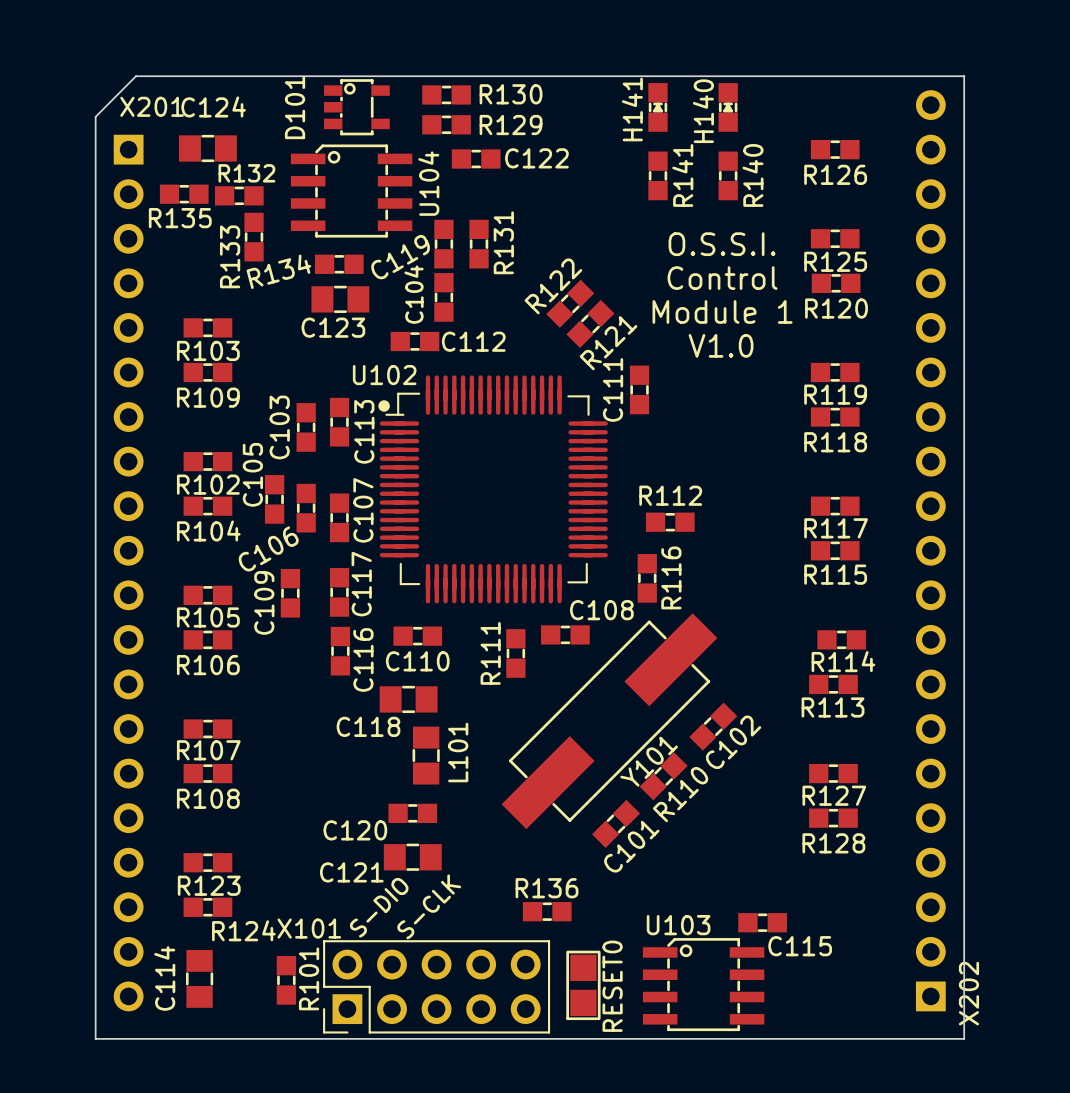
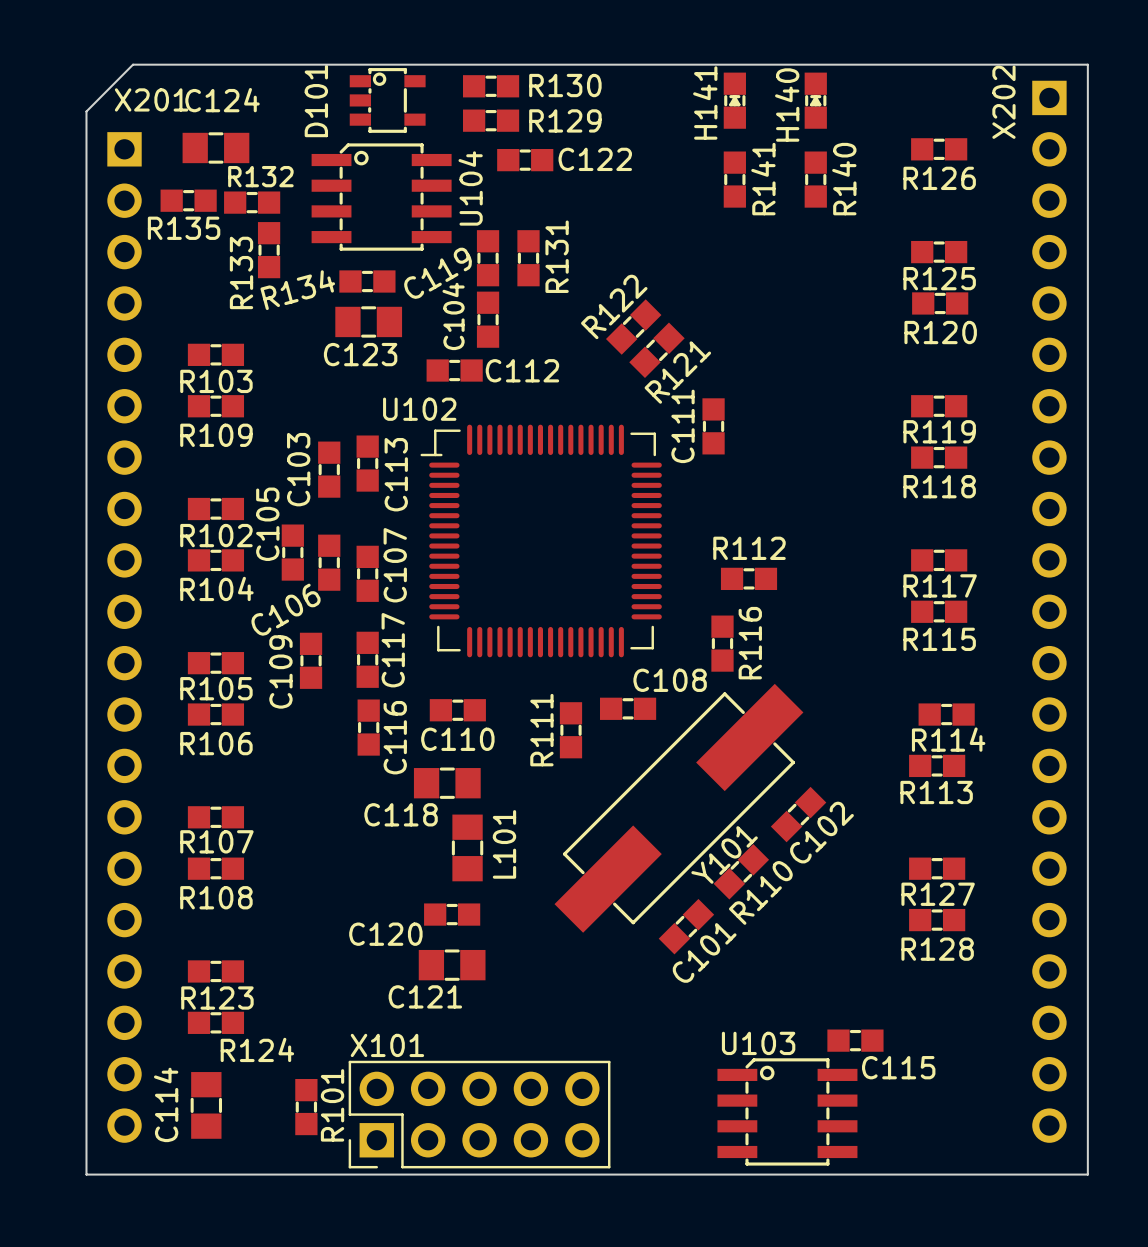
text: O.S.S.I. (722, 244) -> none
text: Control (722, 278) -> none
text: Module 1 (722, 311) -> none
text: V1.0 (721, 345) -> none
U102 footprint: [378, 375, 608, 604] -> [420, 424, 662, 658]
X202 rotation: 0° (930, 550) -> 180° (1049, 611)
C121 name position: C121 (351, 872) -> C121 (425, 996)
text: S-CLK (429, 906) -> none
text: S-DIO (379, 907) -> none
R136: (547, 911) -> none
X101 name position: X101 (309, 928) -> X101 (387, 1045)
RESET0: (583, 985) -> none

